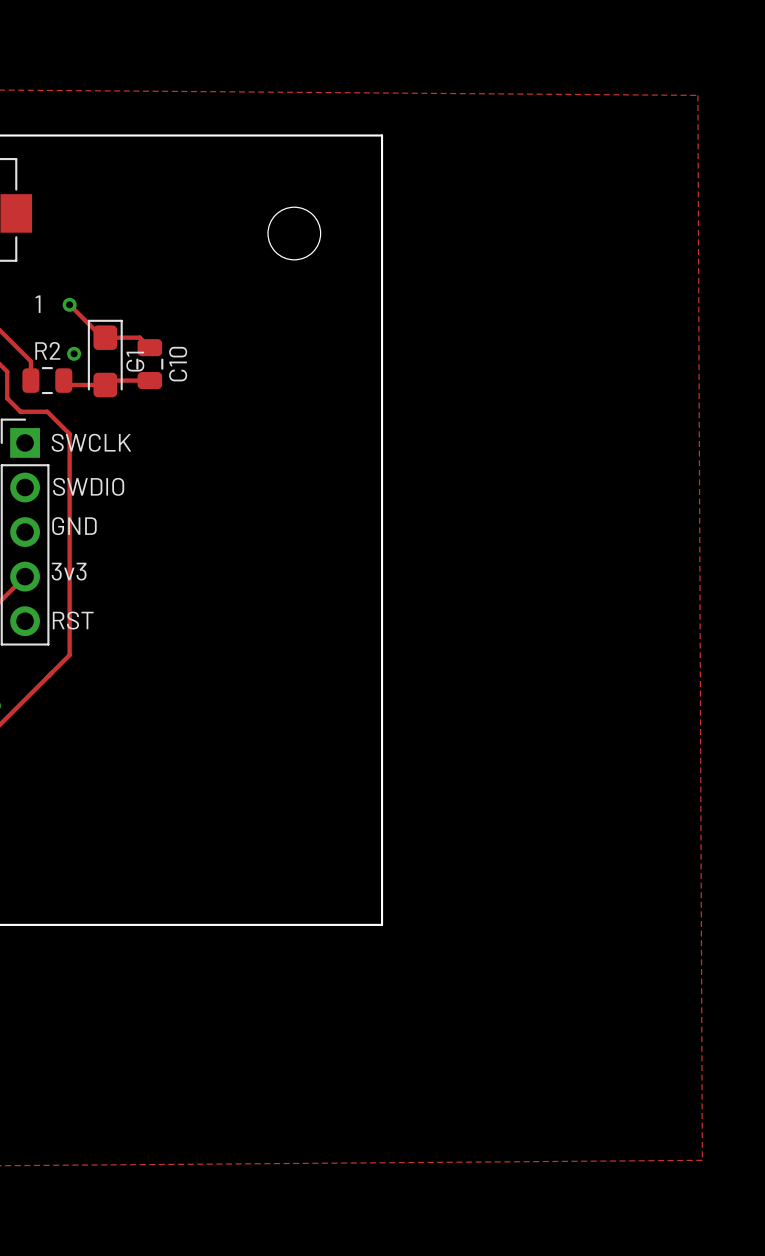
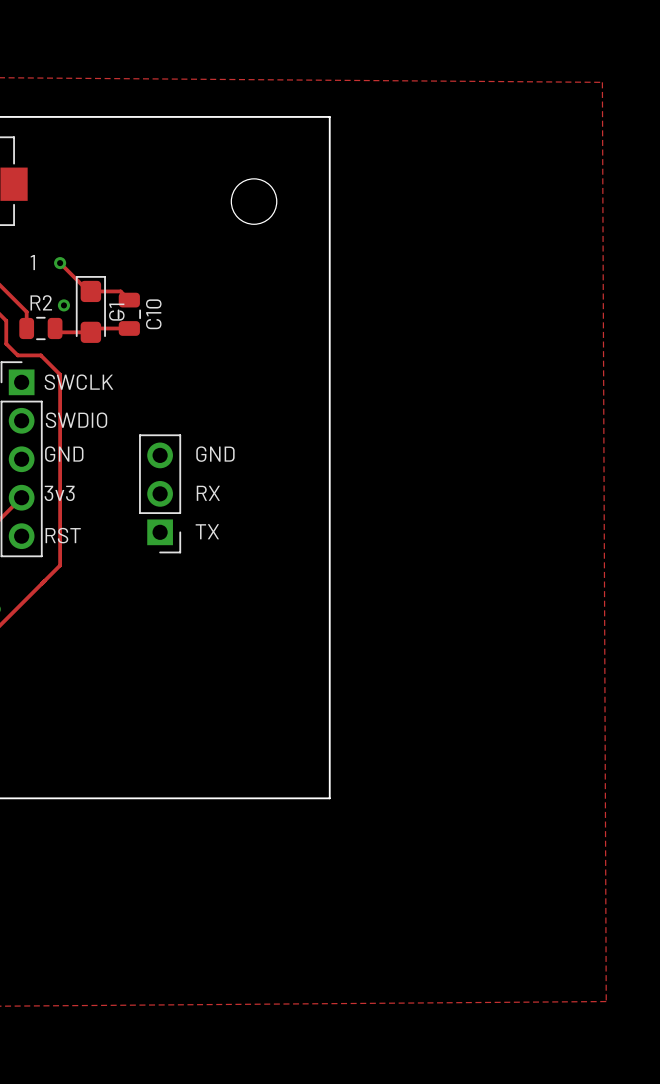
text: none -> GND (215, 454)
text: none -> RX (208, 493)
part: none -> (160, 493)
text: none -> TX (207, 531)

